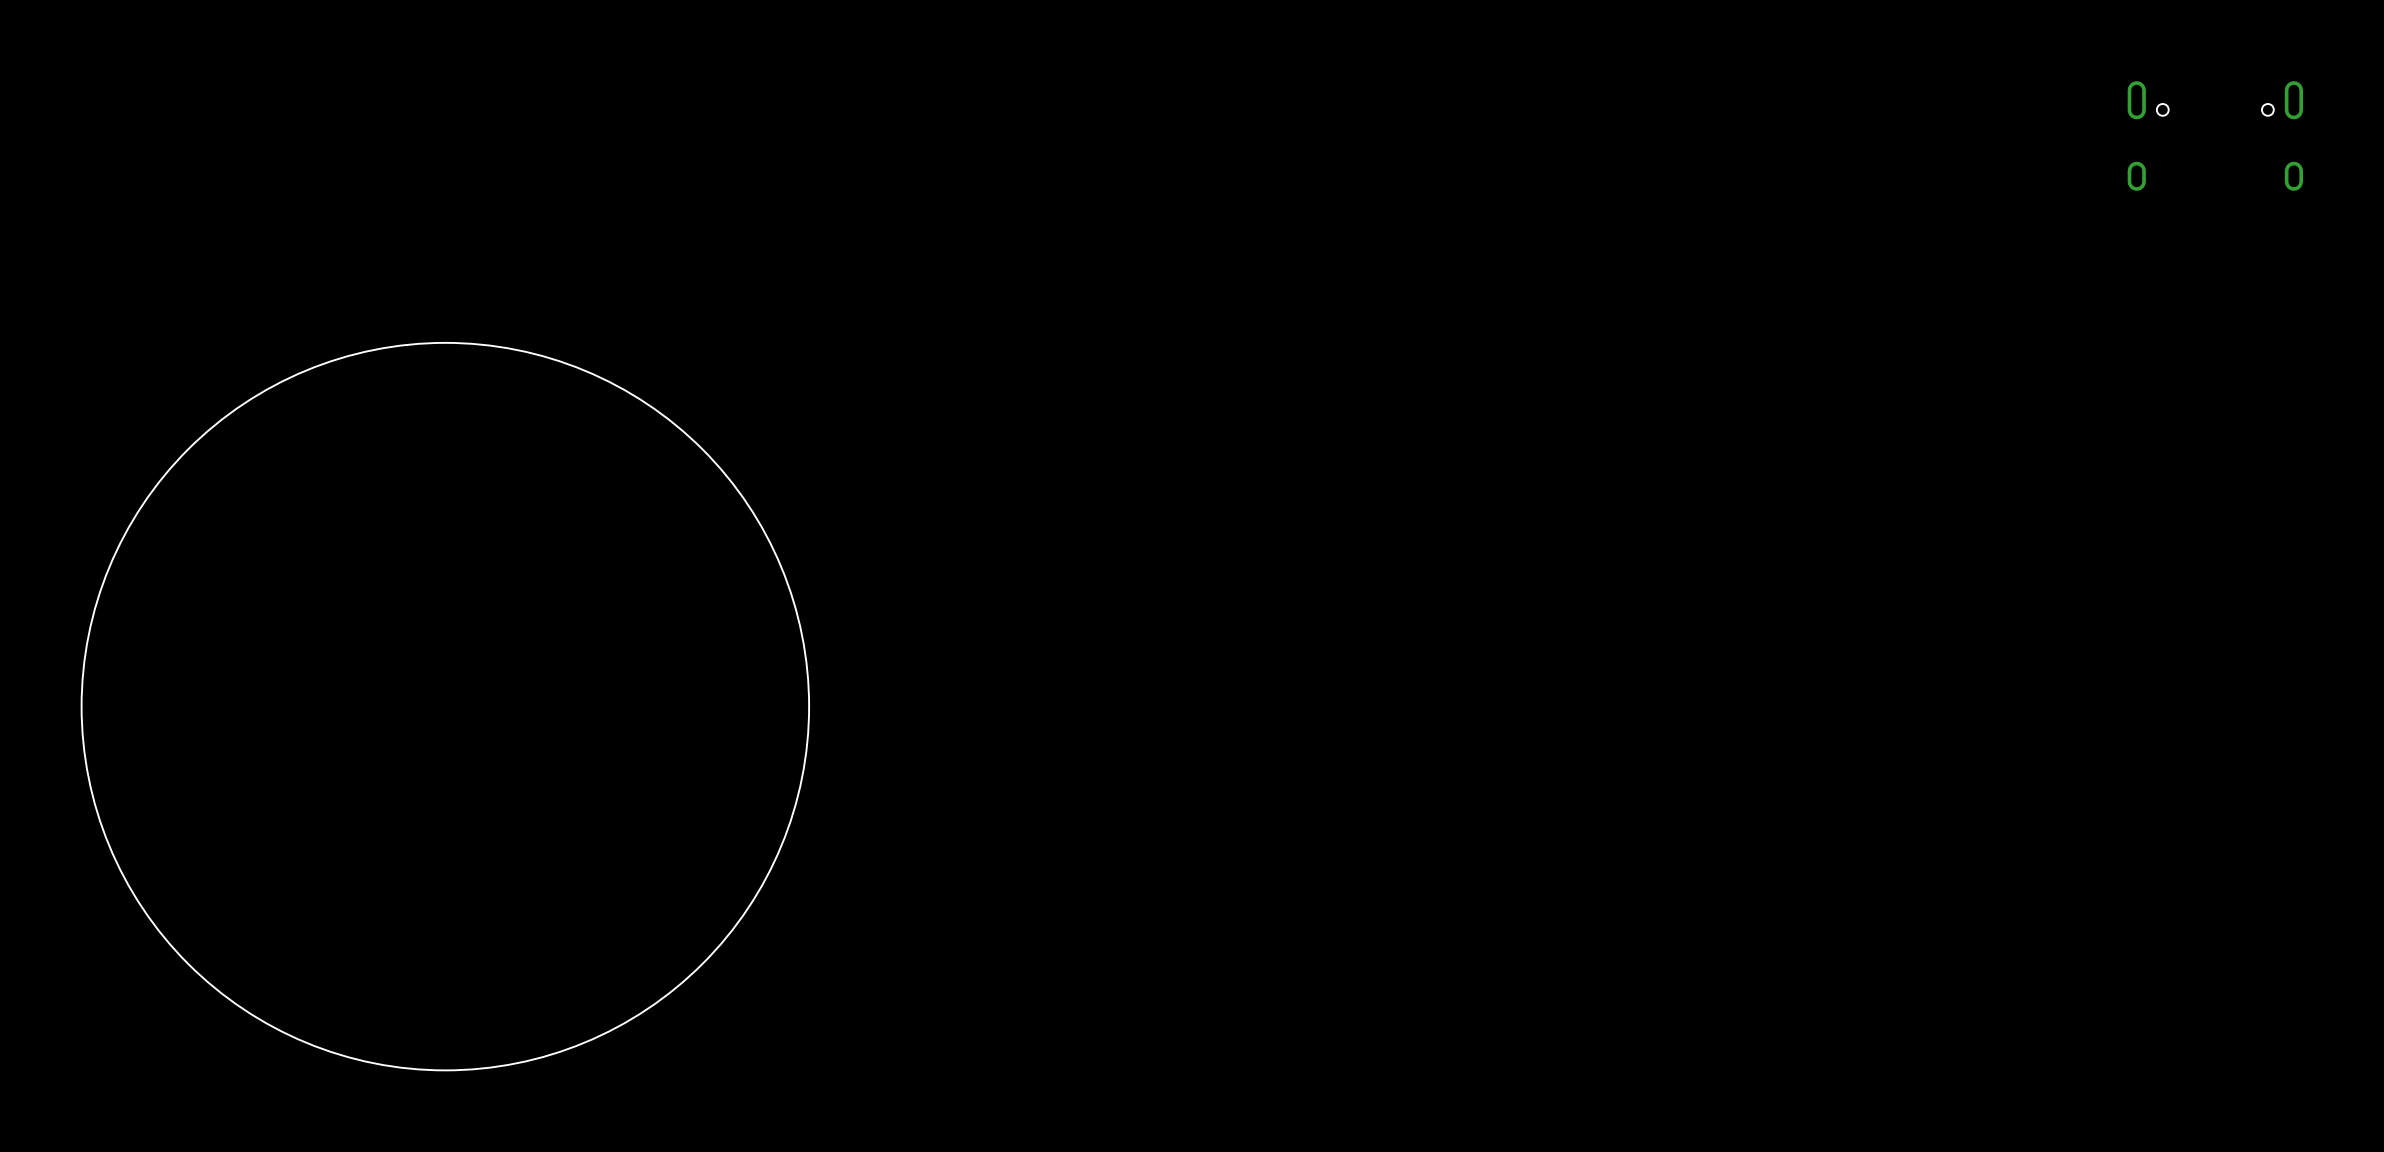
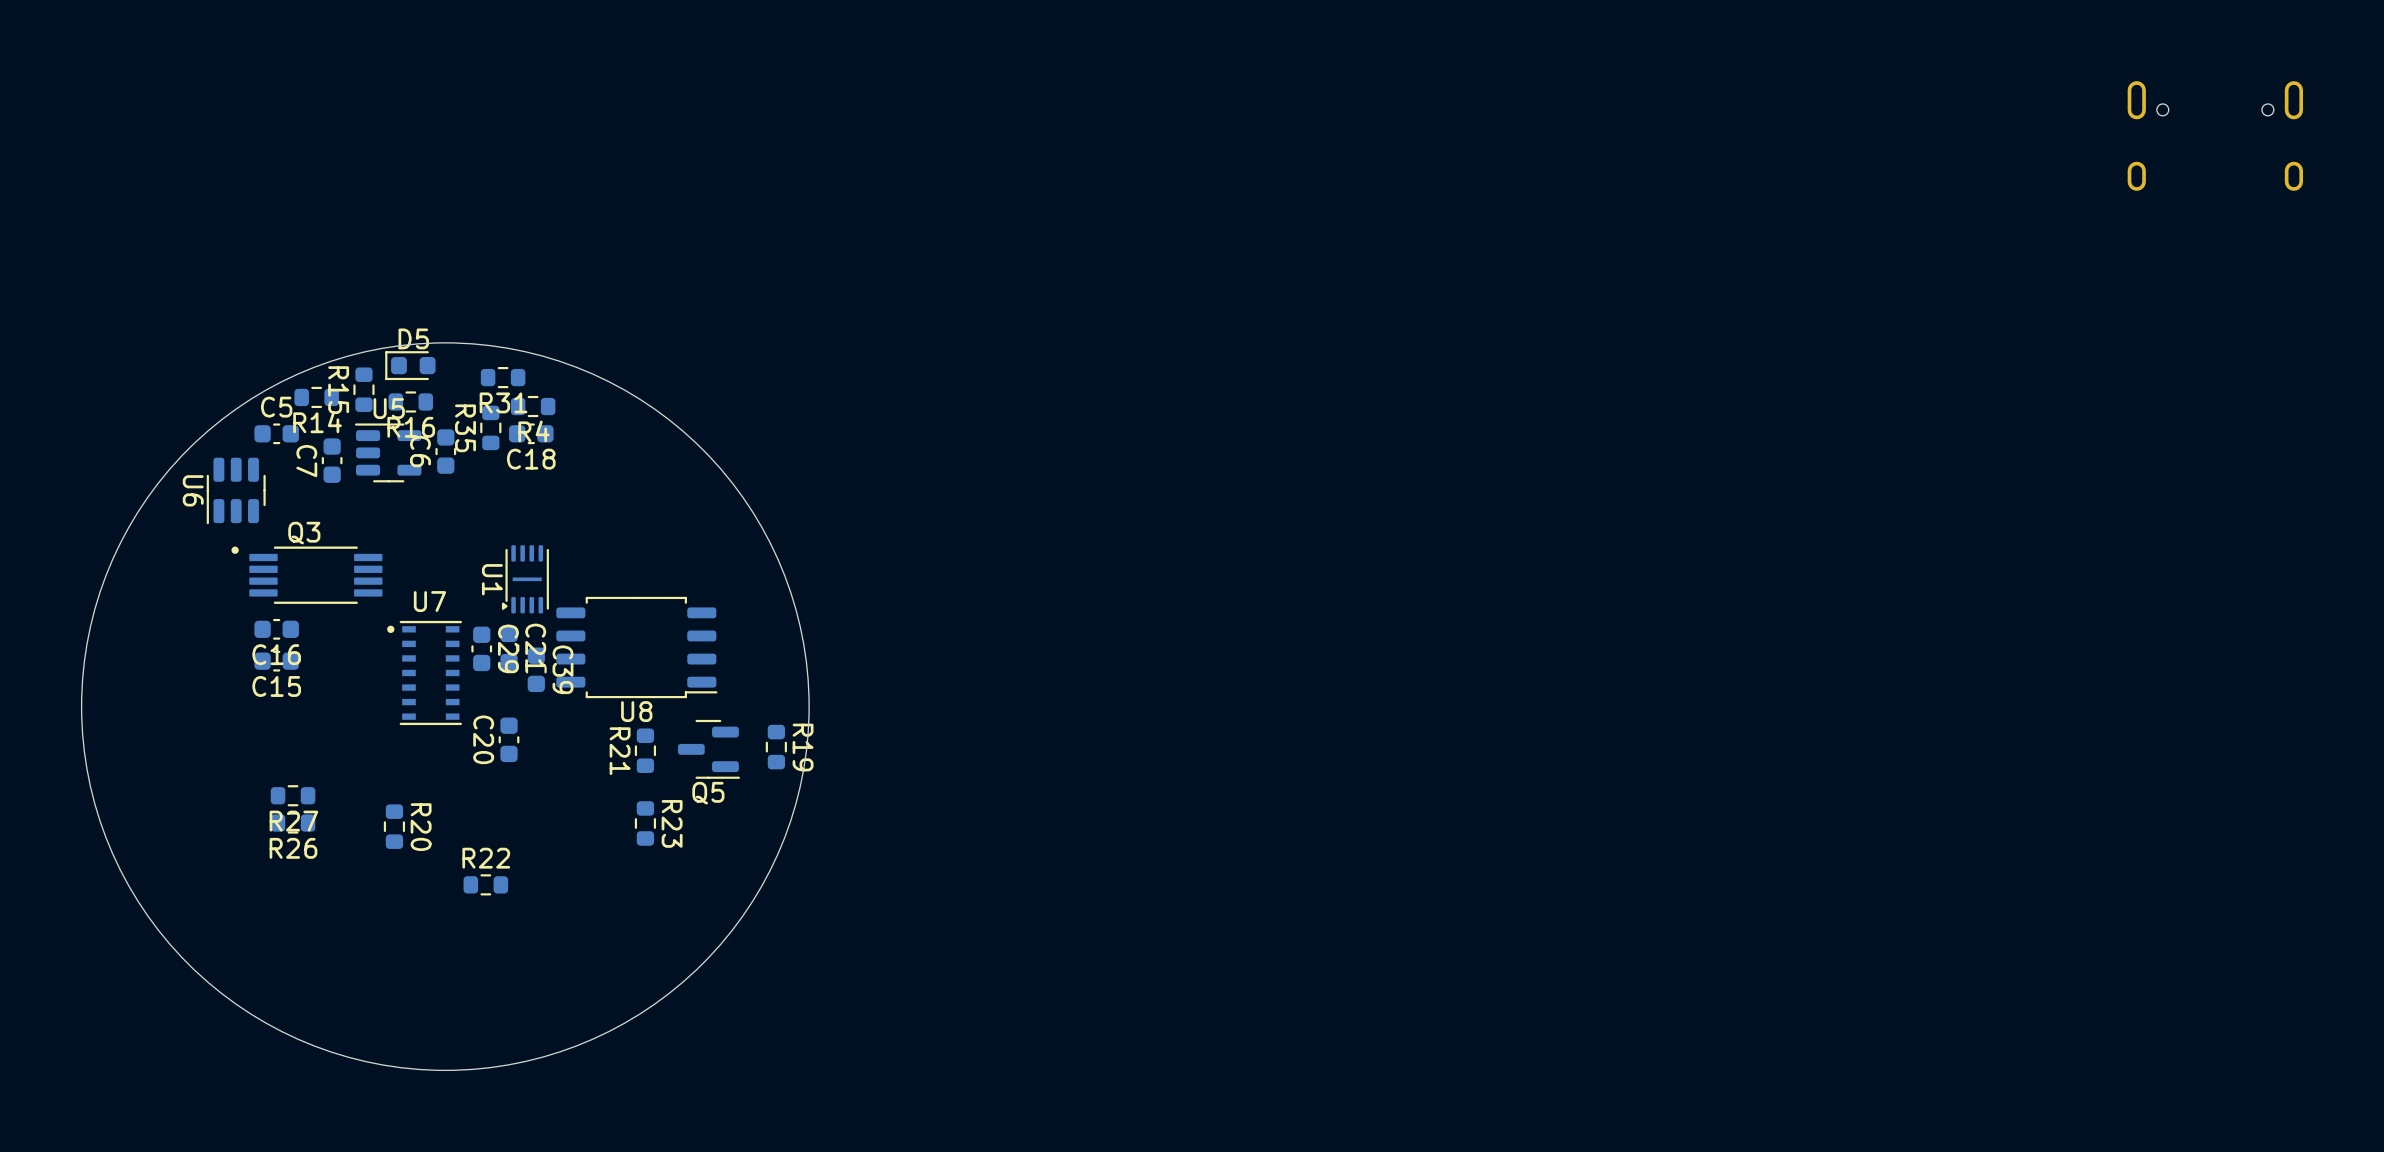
D5: none -> (410, 365)
R31: none -> (503, 377)
R15: none -> (363, 389)
R14: none -> (316, 397)
R16: none -> (410, 401)
R4: none -> (533, 406)
R35: none -> (490, 427)
C5: none -> (276, 433)
C18: none -> (531, 433)
C6: none -> (445, 451)
U5: none -> (388, 452)
C7: none -> (332, 460)
U6: none -> (236, 490)
Q3: none -> (306, 575)
U1: none -> (525, 579)
C16: none -> (276, 629)
C21: none -> (509, 647)
U8: none -> (636, 647)
C29: none -> (481, 648)
C15: none -> (276, 661)
C39: none -> (536, 669)
U7: none -> (424, 672)
C20: none -> (509, 739)
R19: none -> (776, 747)
Q5: none -> (708, 749)
R21: none -> (645, 750)
R27: none -> (293, 795)
R26: none -> (293, 823)
R23: none -> (645, 823)
R20: none -> (394, 826)
R22: none -> (485, 884)

